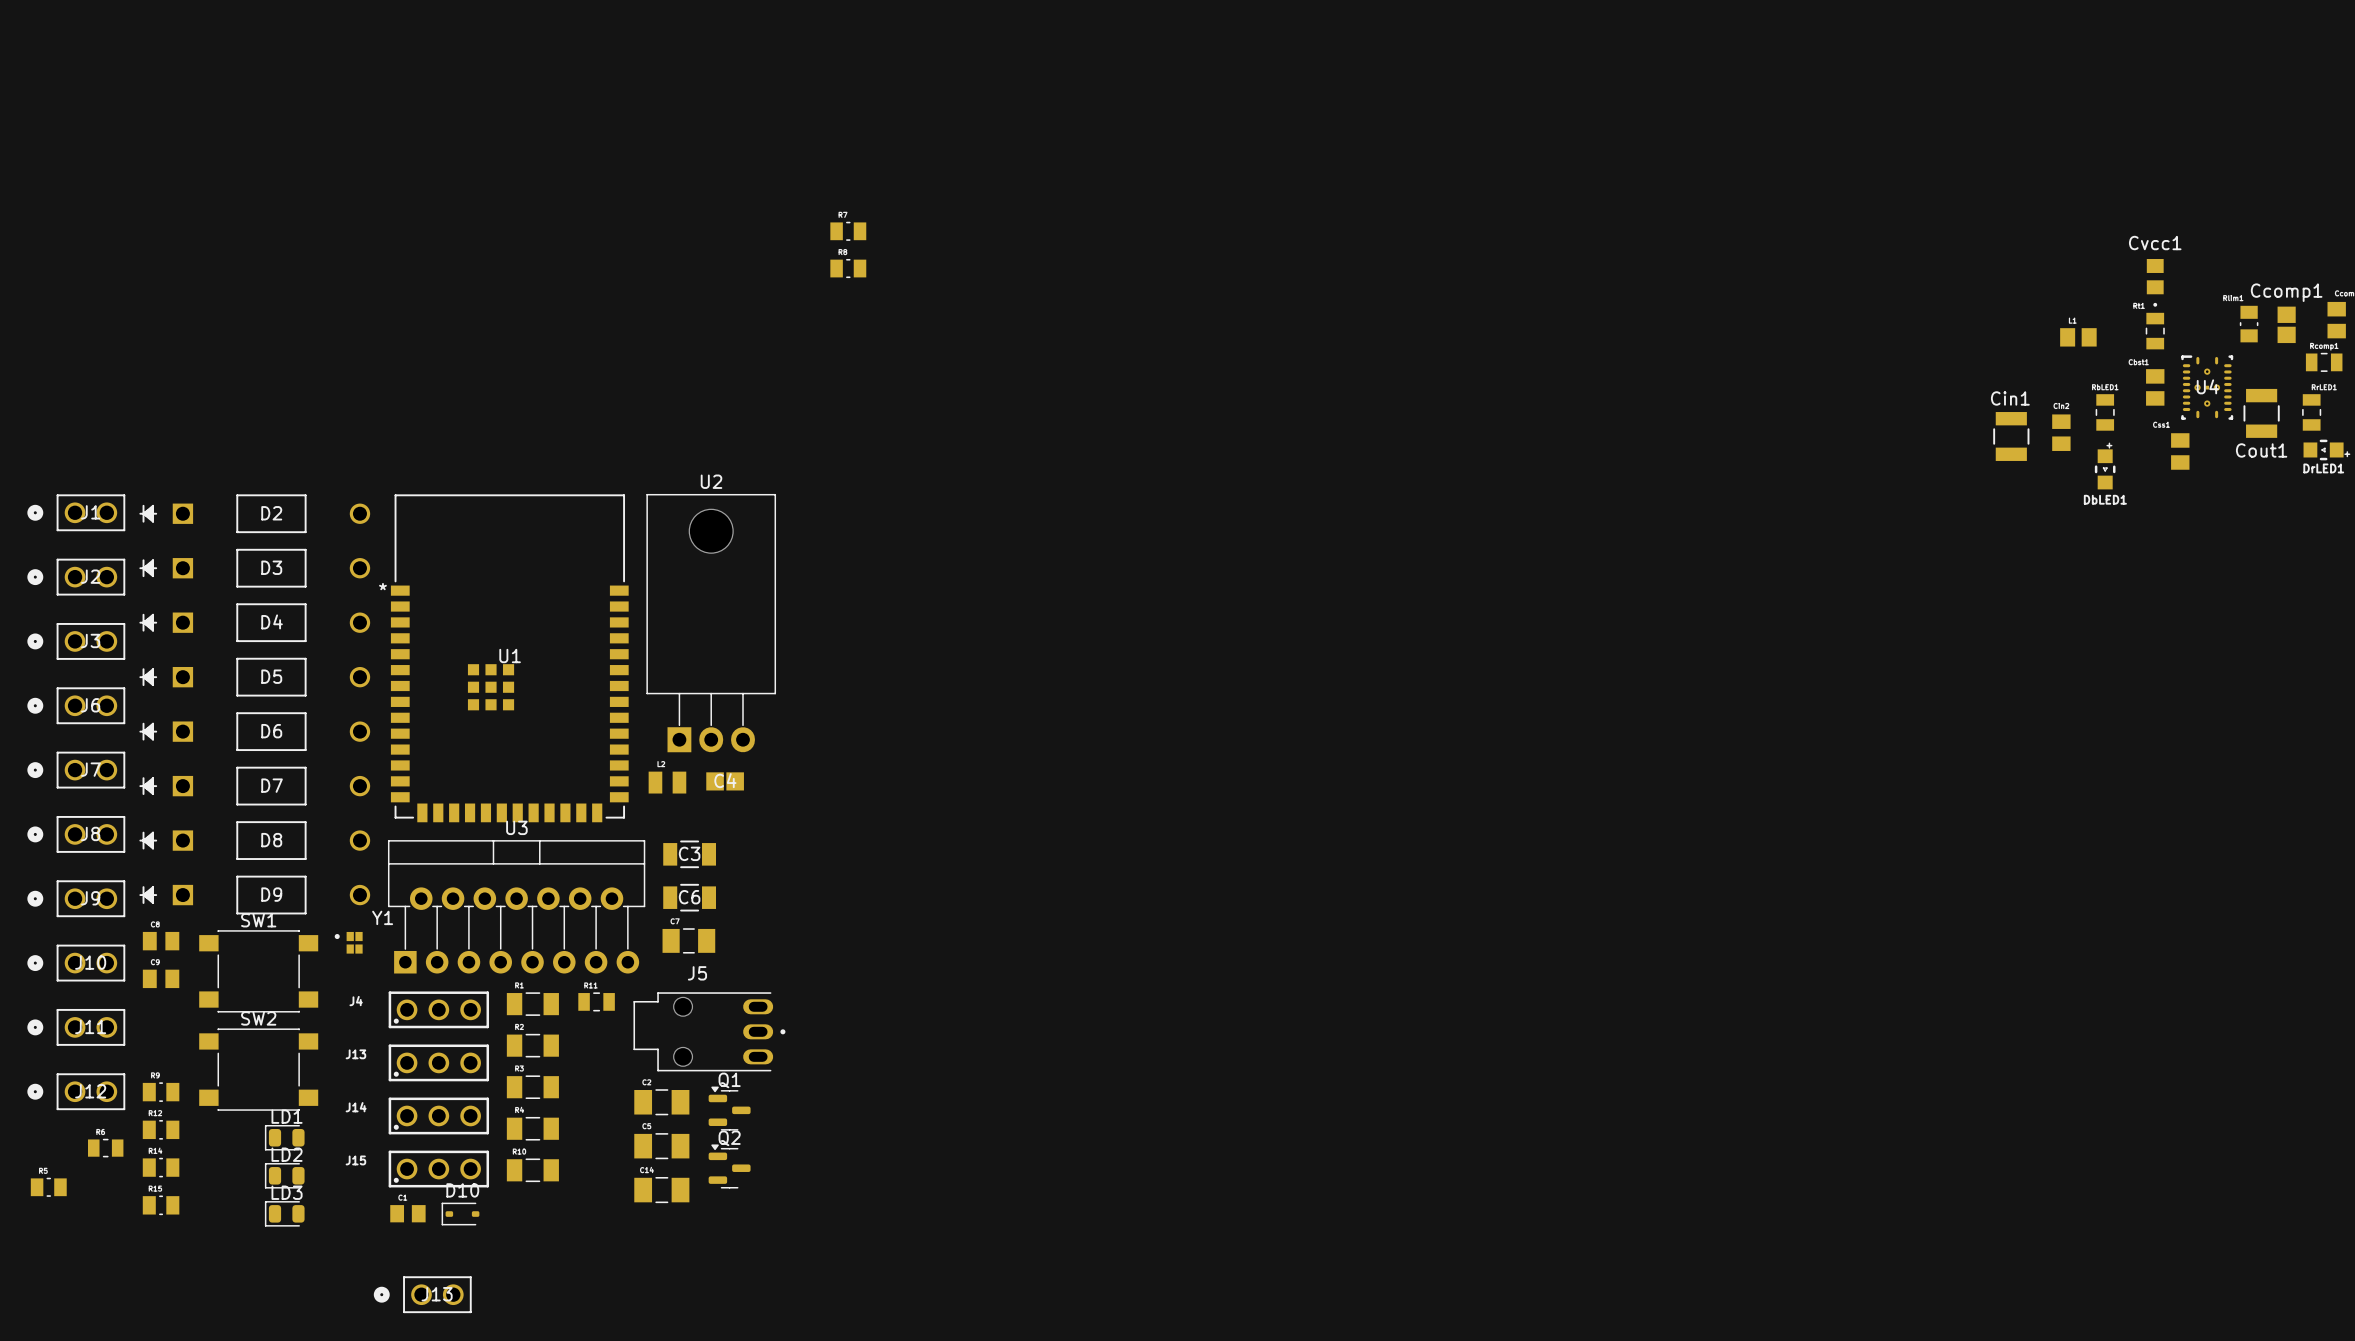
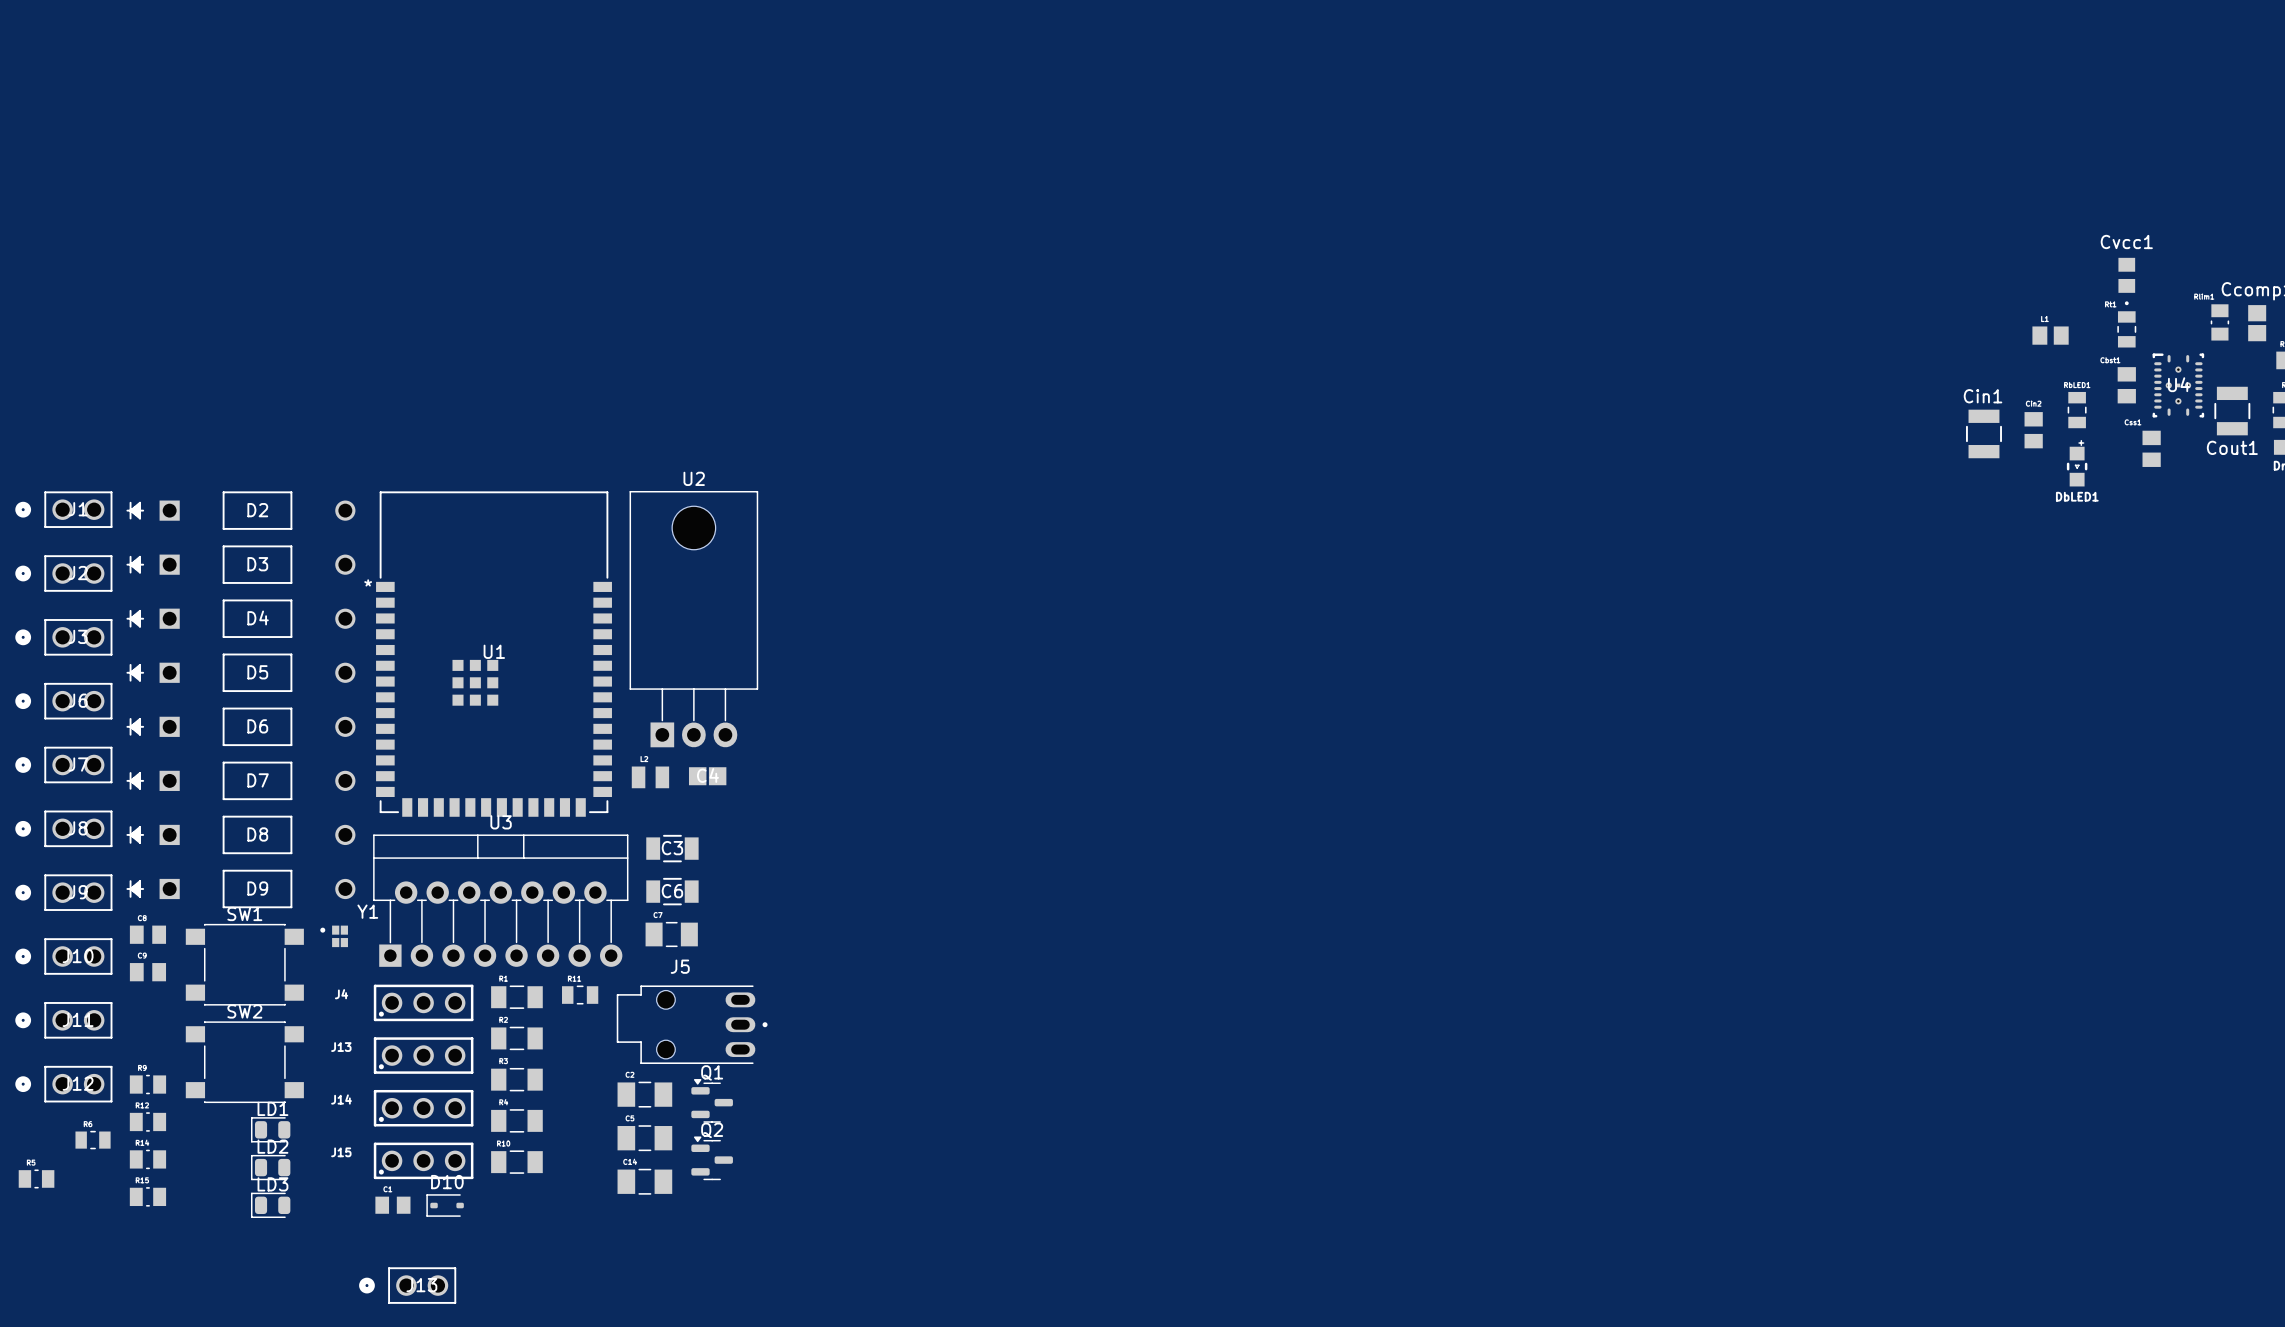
part: (848, 231) -> none
part: (848, 268) -> none

